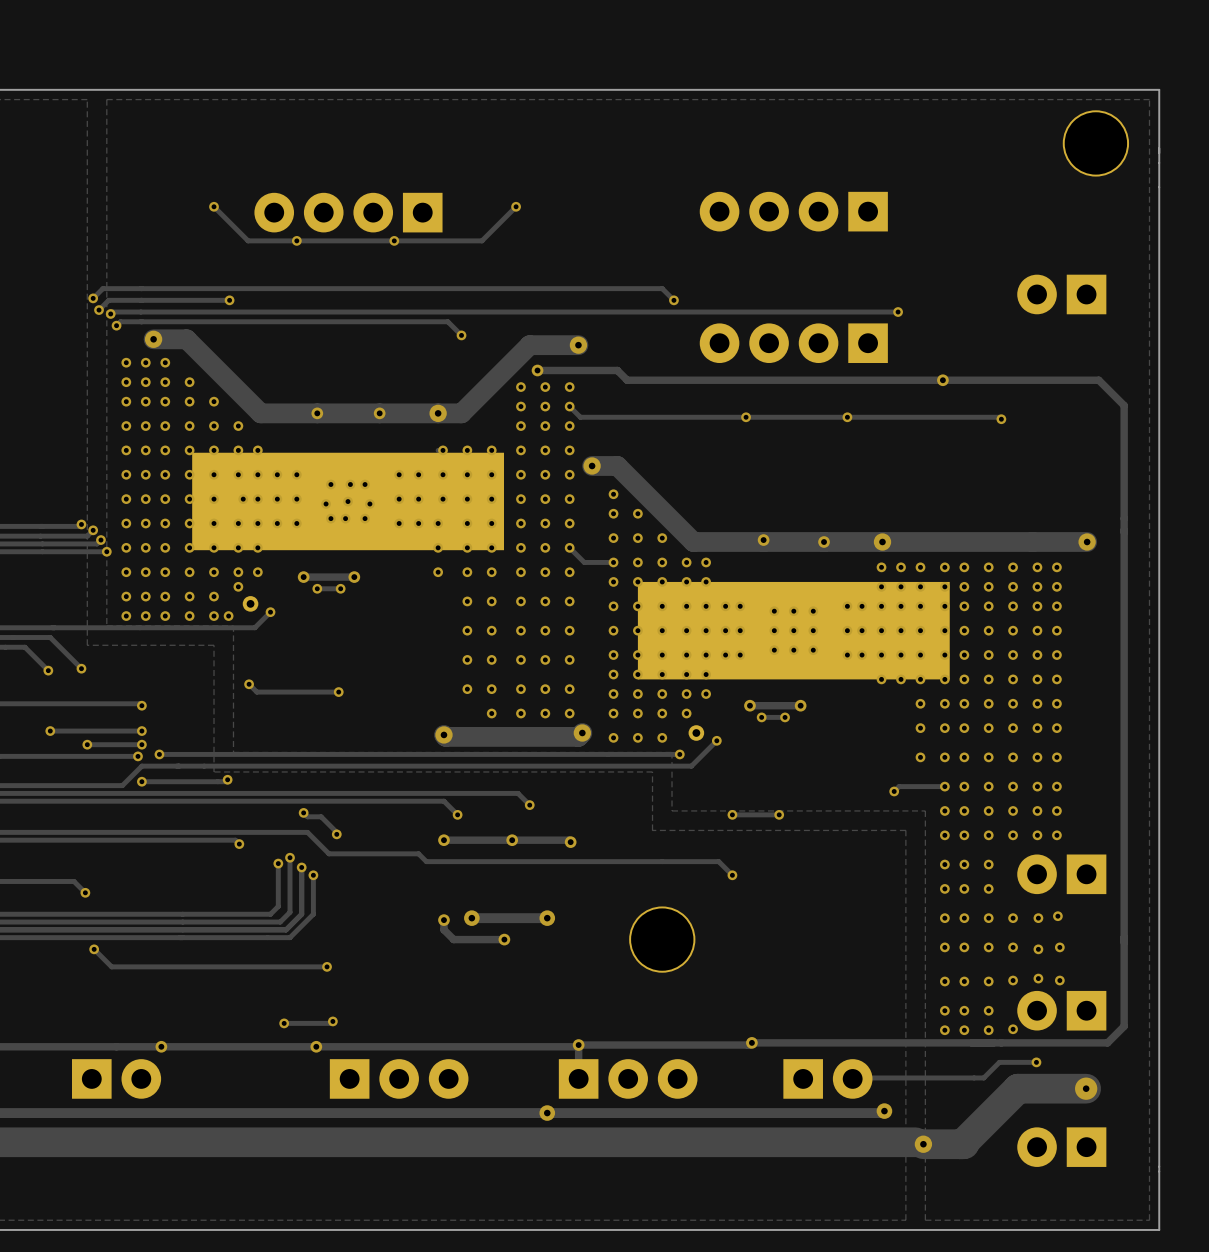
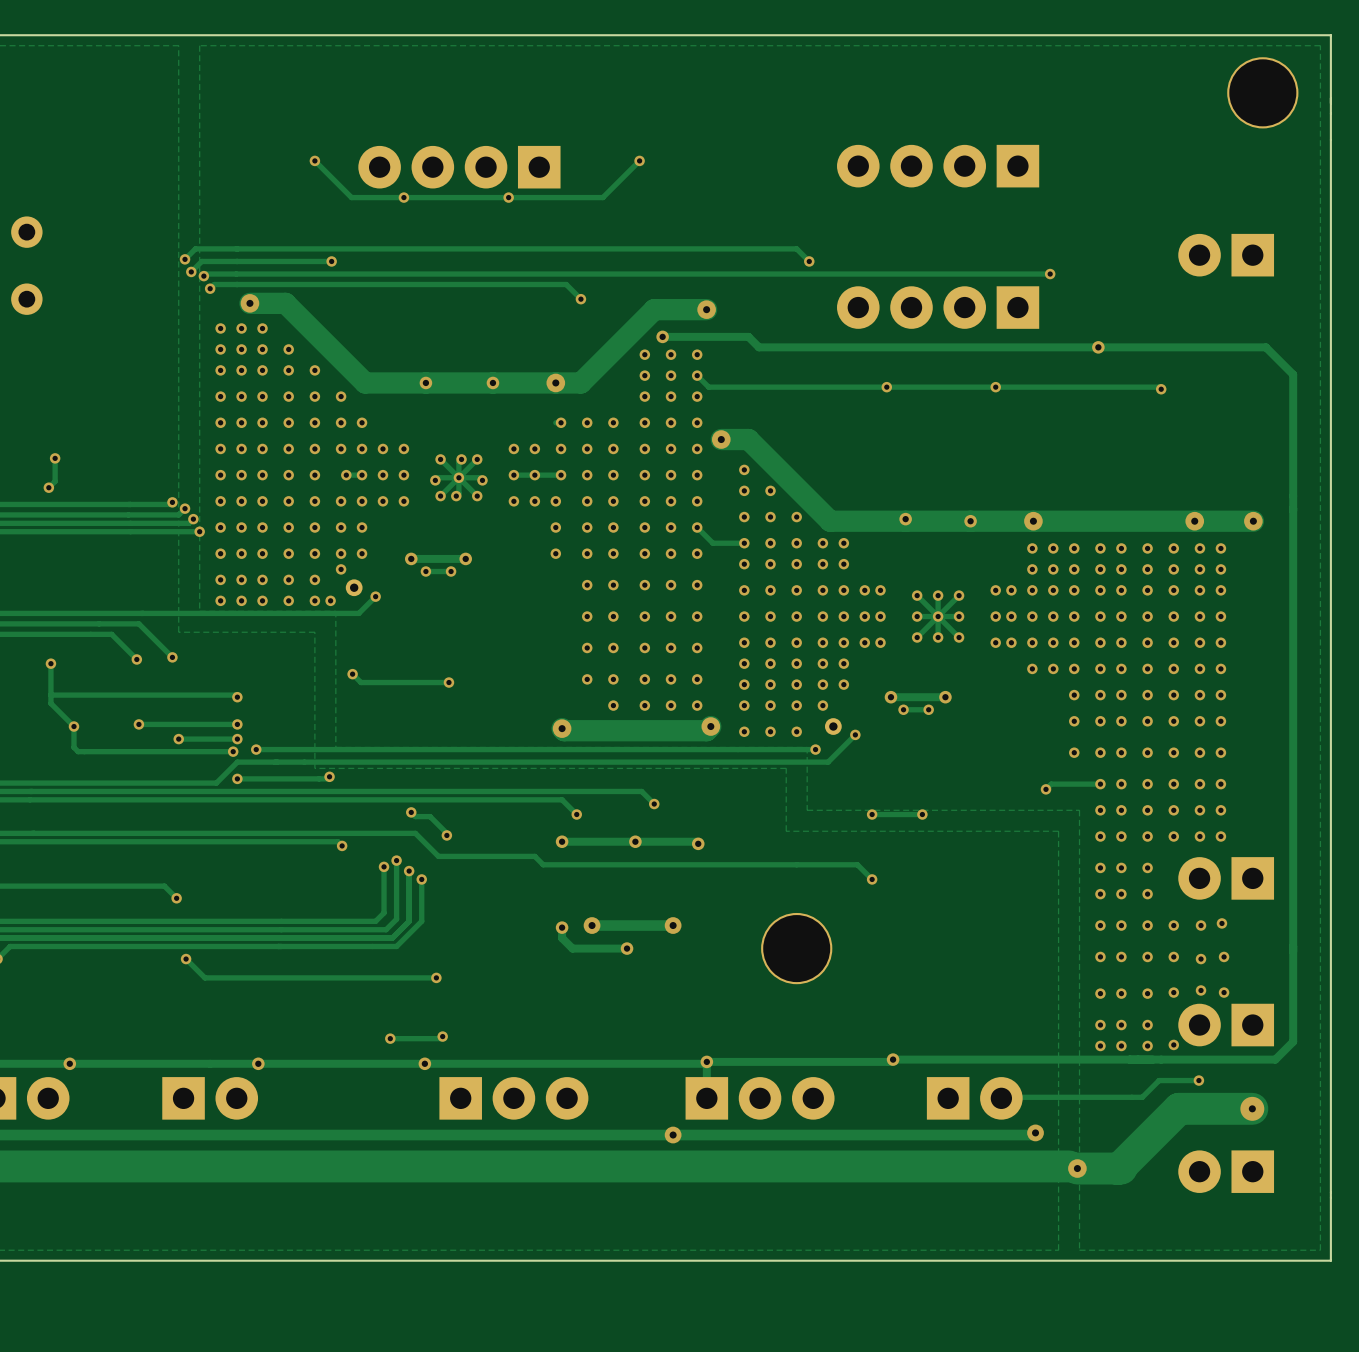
part: (348, 501) -> none
via: none -> (1194, 521)
part: (793, 630) -> none

